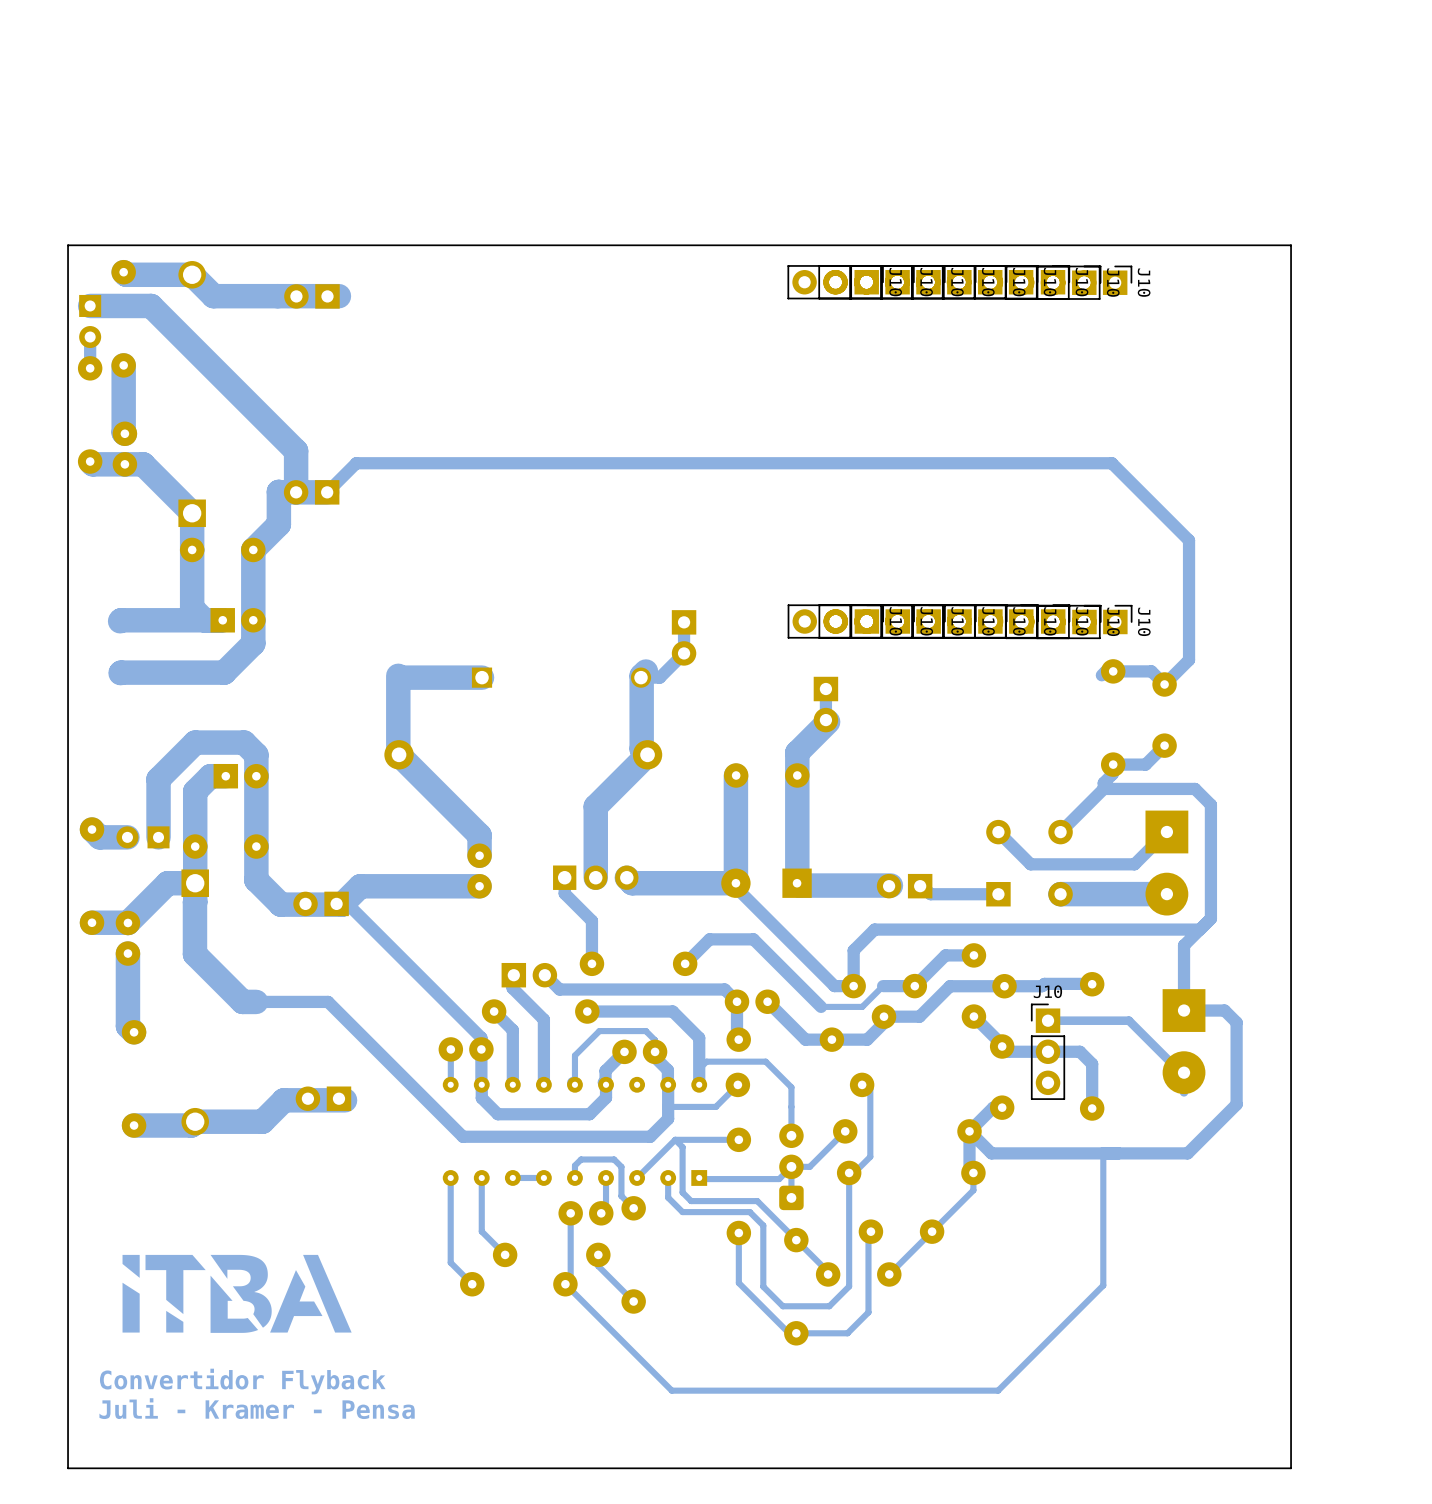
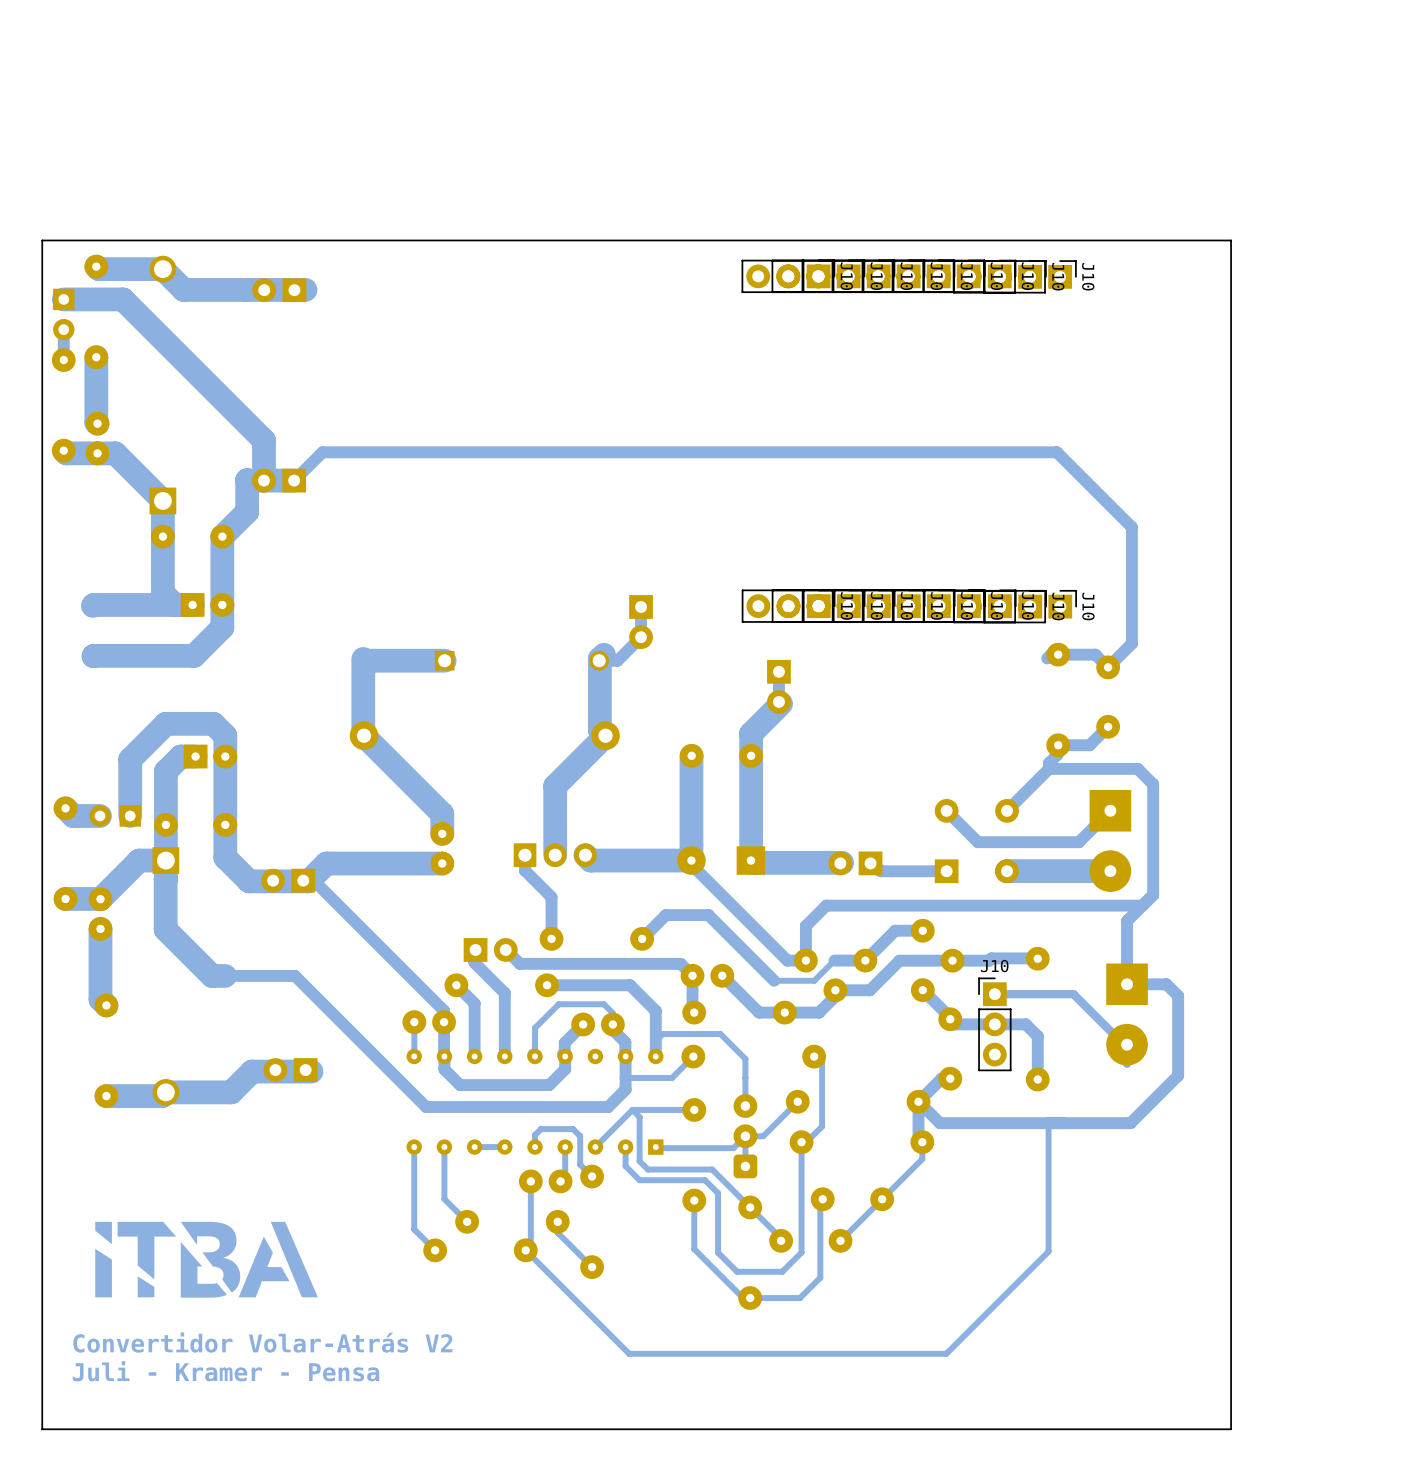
text: Convertidor Flyback (242, 1381) -> Convertidor Volar-Atrás V2 (262, 1342)

